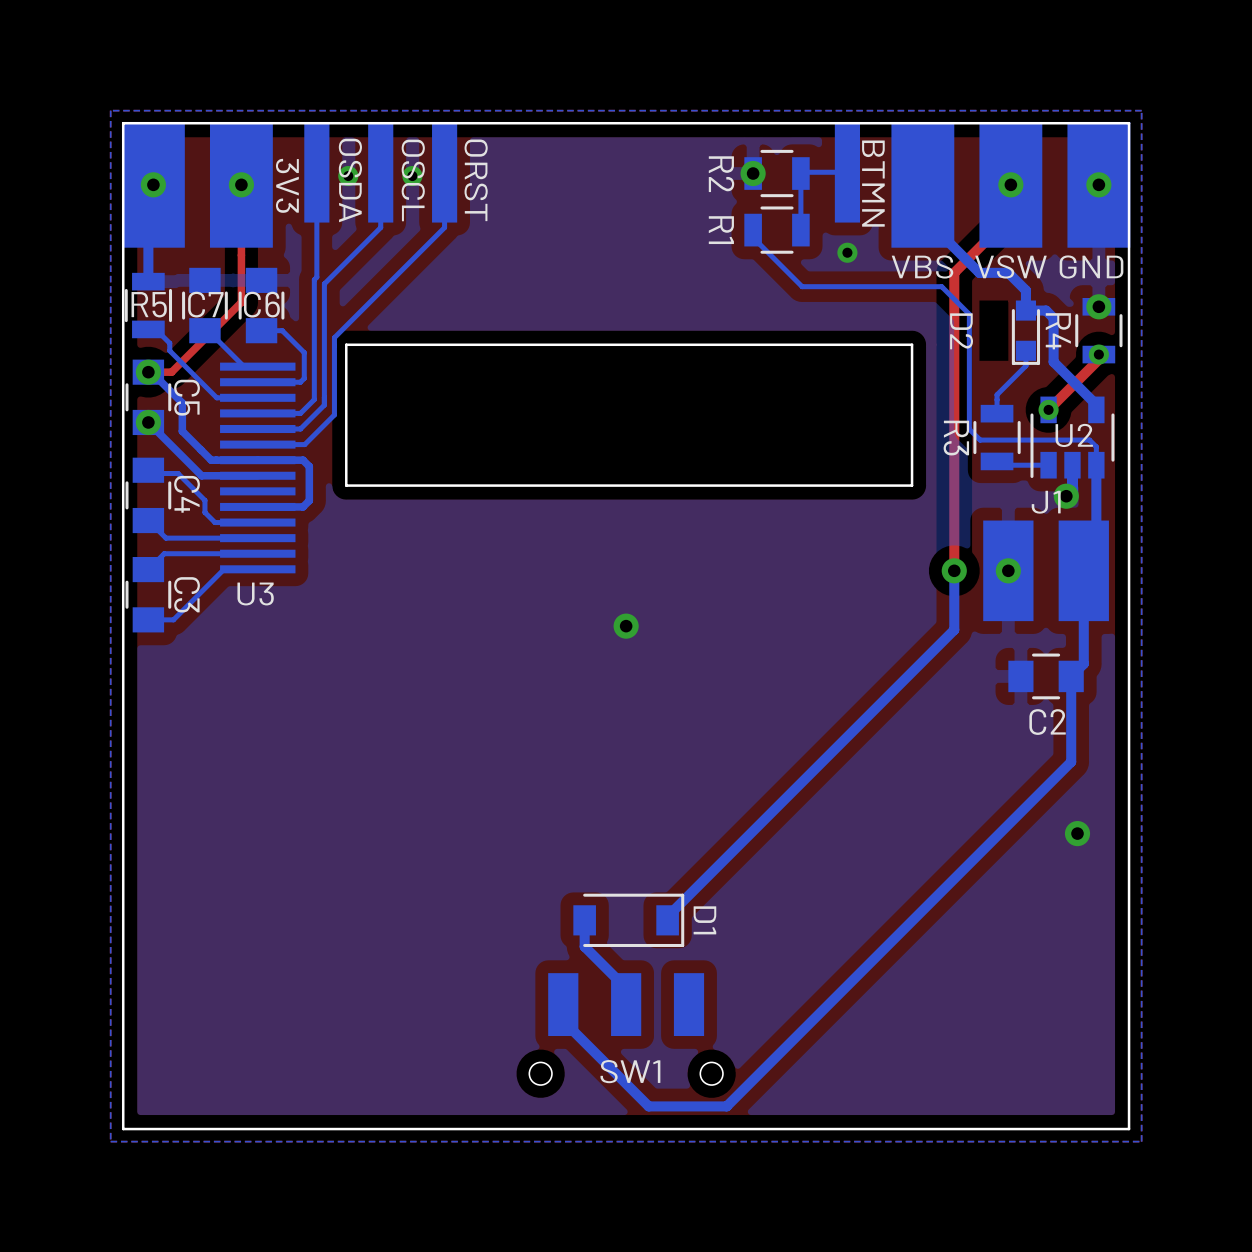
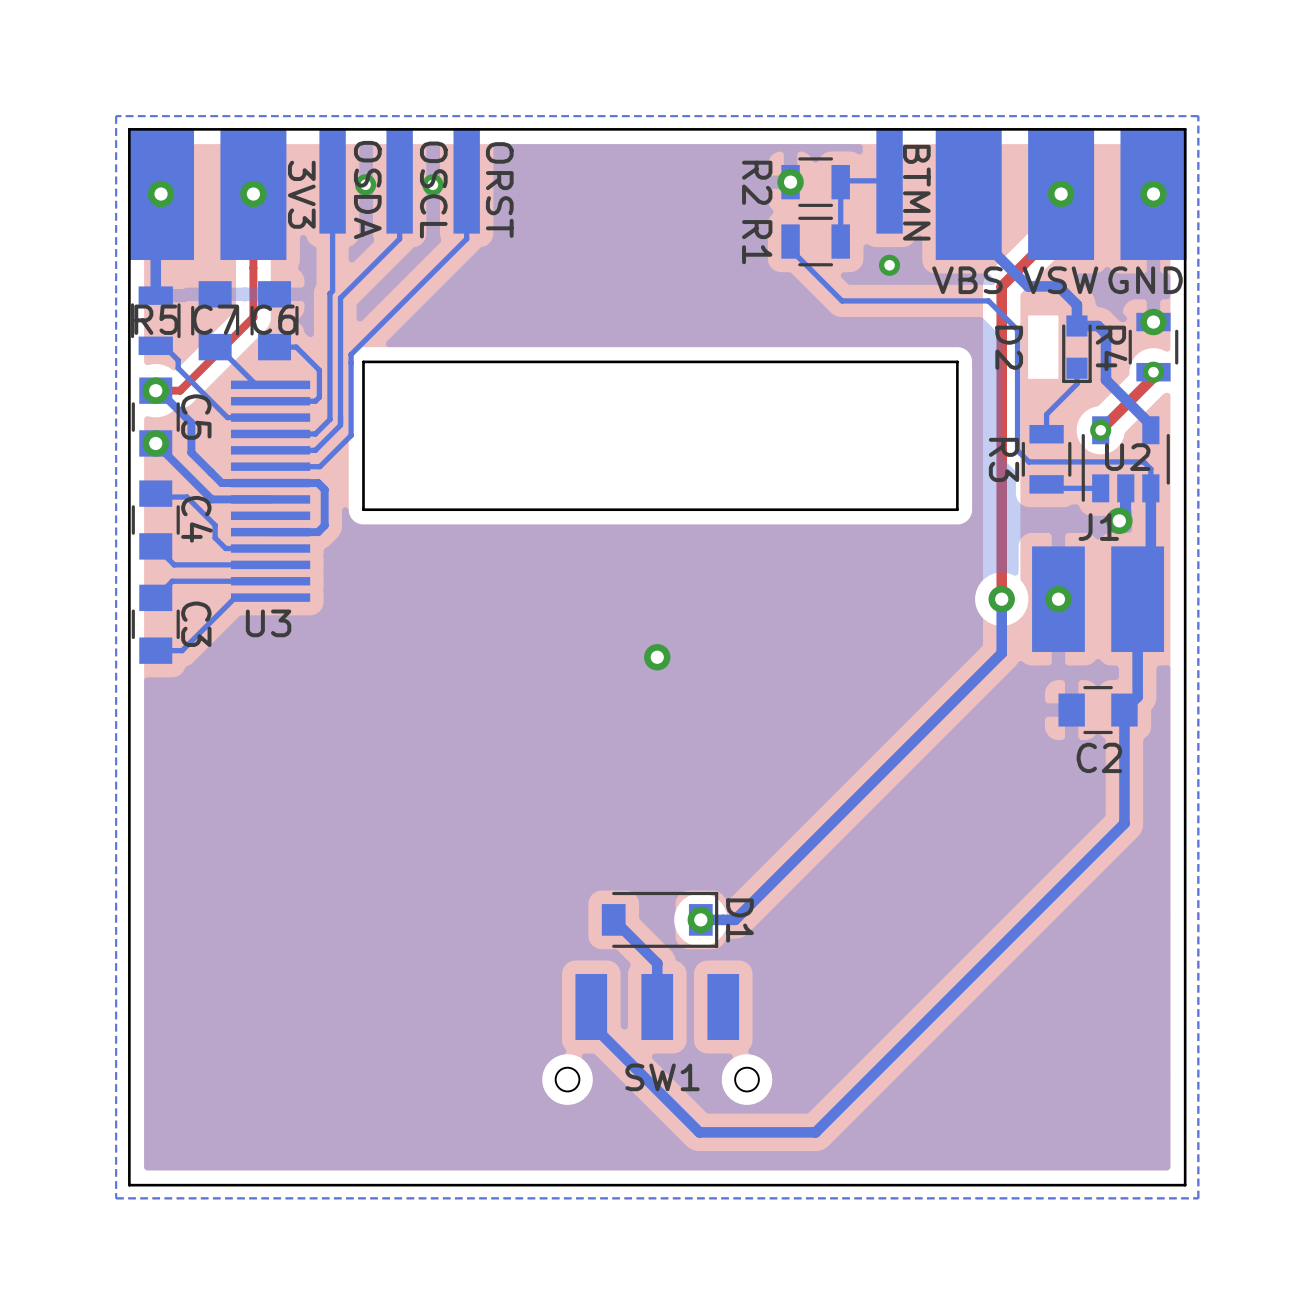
bottom track: (954, 622) (954, 629) (667, 916) (667, 920) -> (1001, 653) (735, 919) (700, 919)
bottom track: (1071, 761) (726, 1106) (648, 1106) (563, 1020) (563, 1004) -> (1124, 799) (1124, 823) (815, 1132) (699, 1132) (591, 1024) (591, 1006)
via: (1077, 833) -> none
bottom track: none -> (613, 919) (657, 963) (657, 1006)
via: none -> (700, 919)
bottom track: (584, 920) (584, 946) (626, 988) (626, 1004) -> none
D1 position: (628, 920) -> (660, 919)
SW1 position: (626, 1029) -> (657, 1032)

